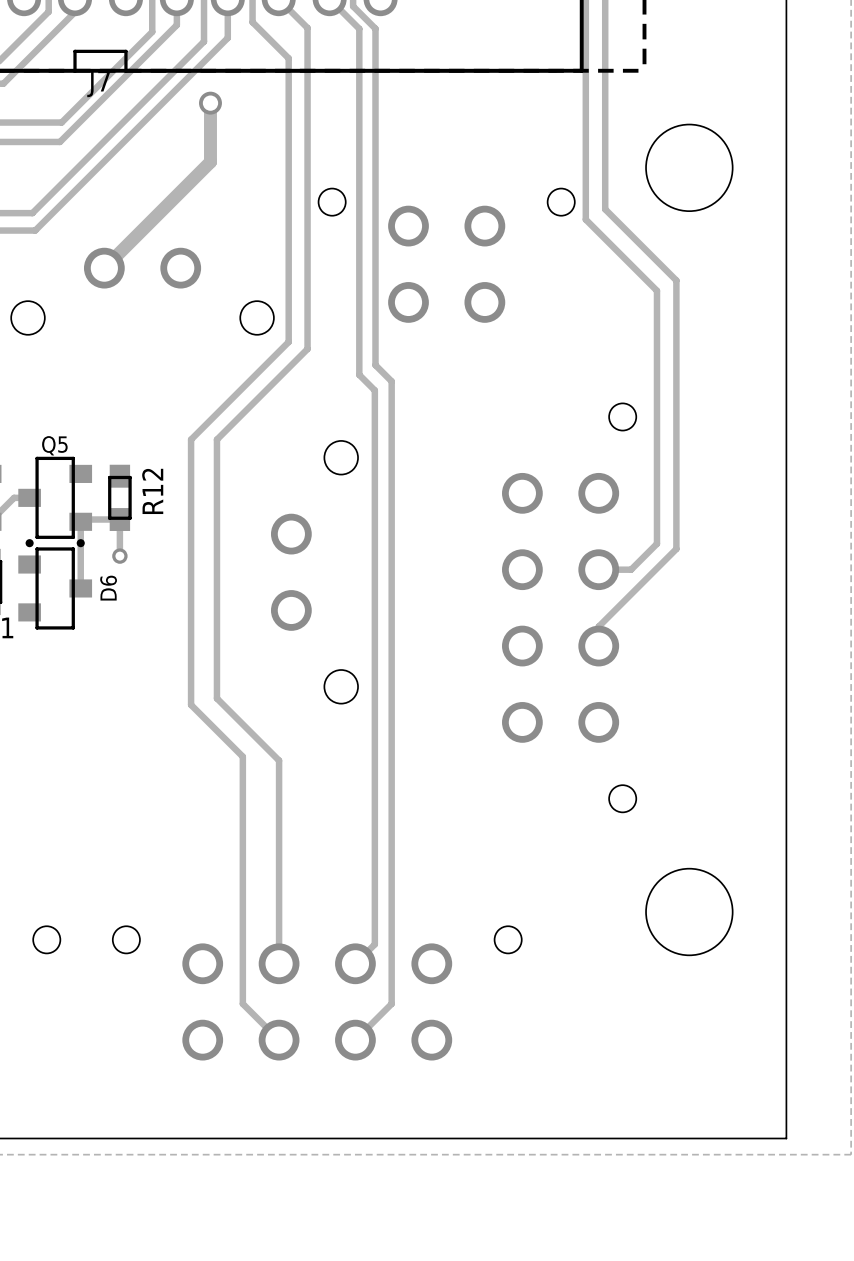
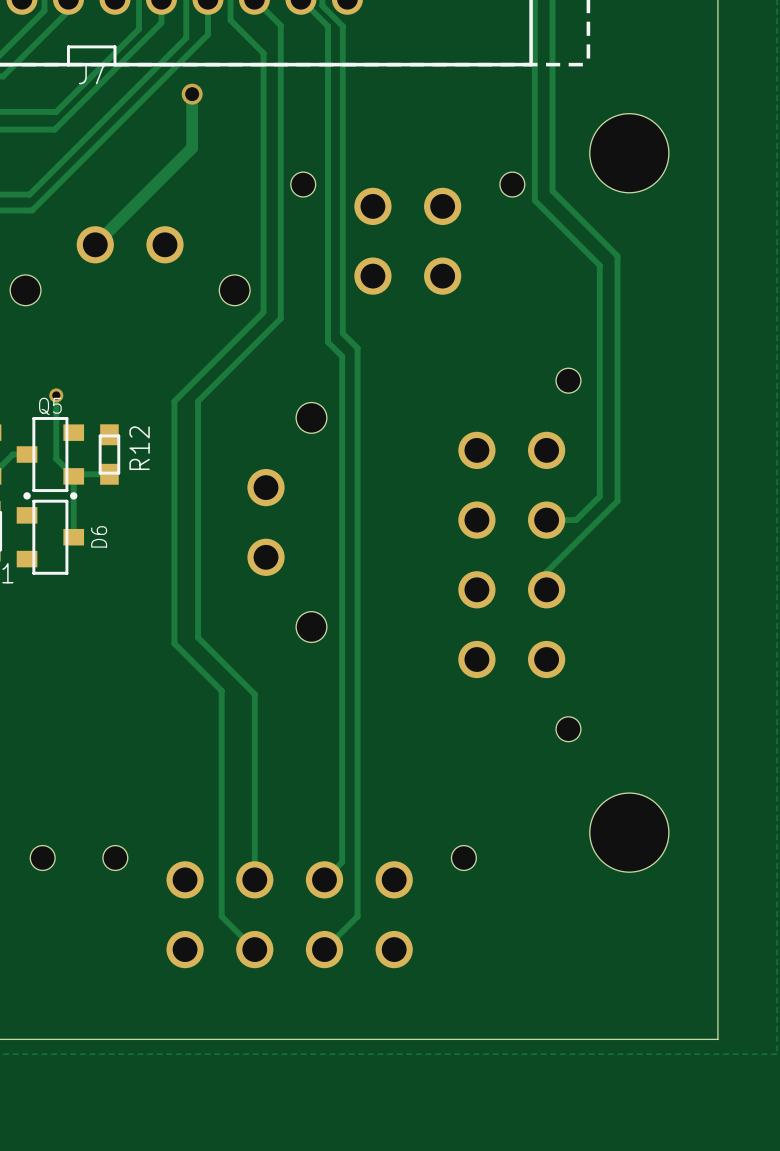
track: none -> (56, 395) (56, 458) (73, 476)
track: (119, 519) (119, 556) -> none
via position: (119, 556) -> (56, 395)

